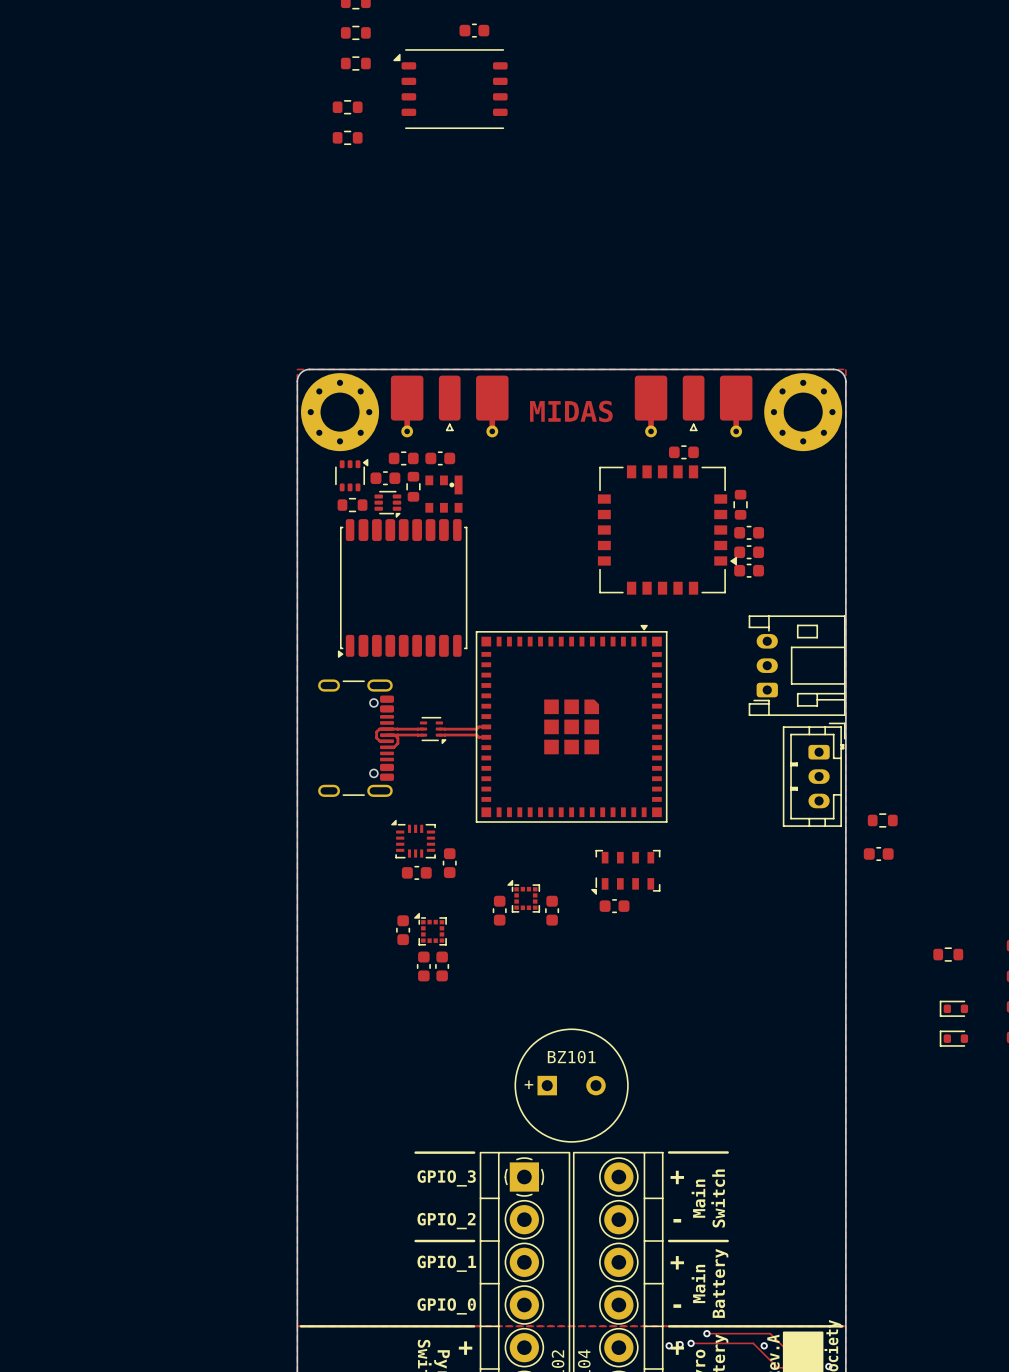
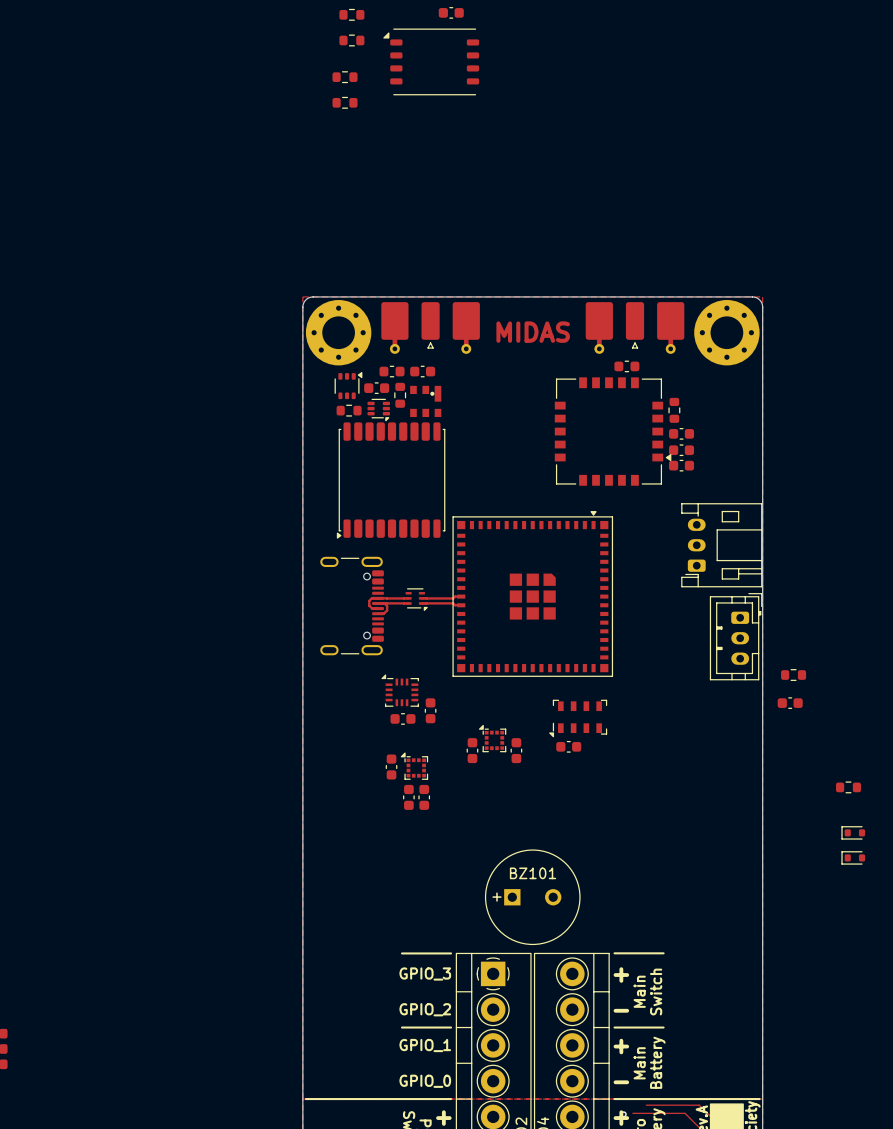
via: (706, 1333) -> none
via: (691, 1343) -> none
via: (669, 1345) -> none
via: (764, 1345) -> none

